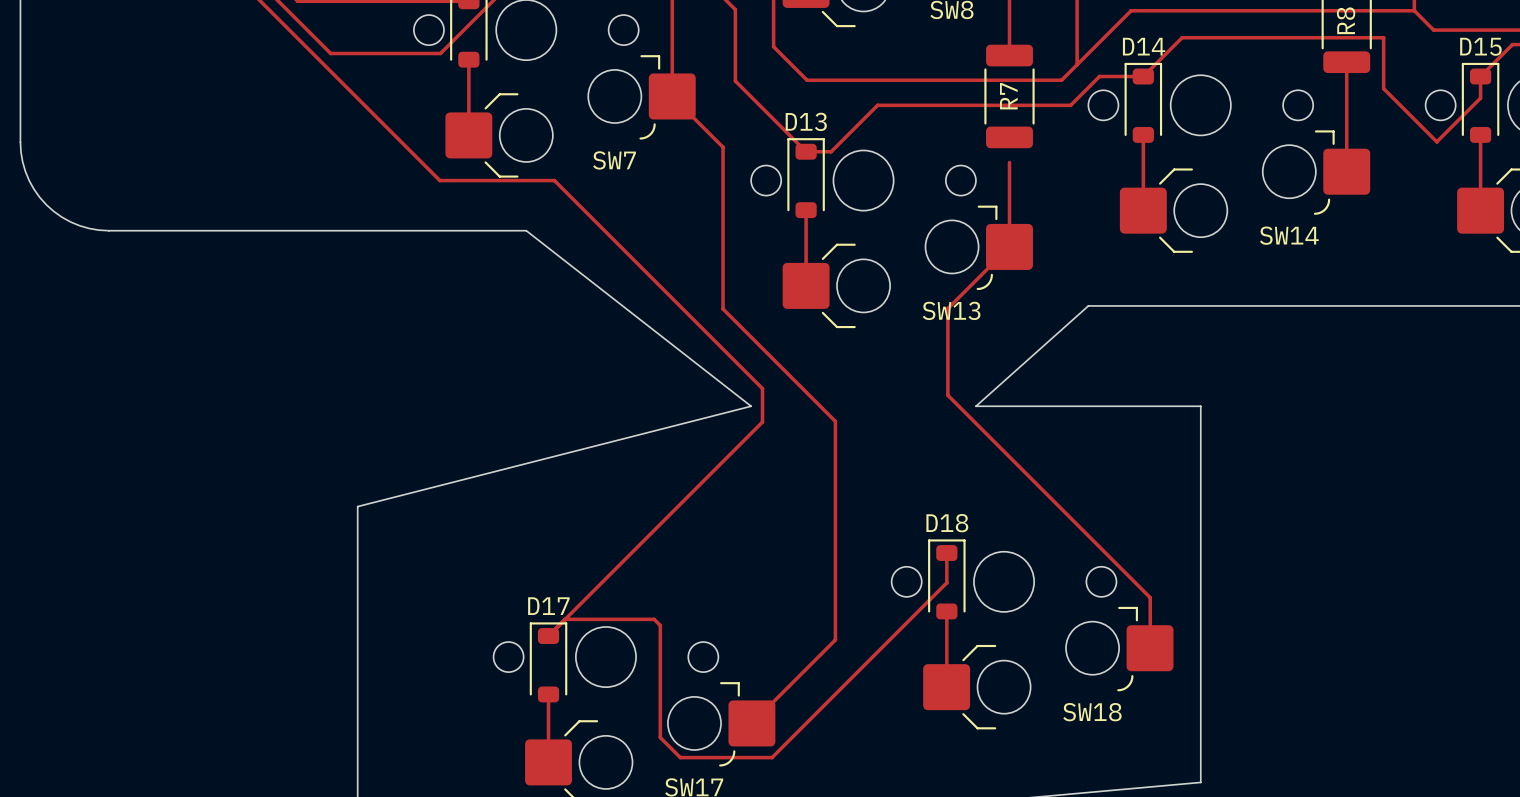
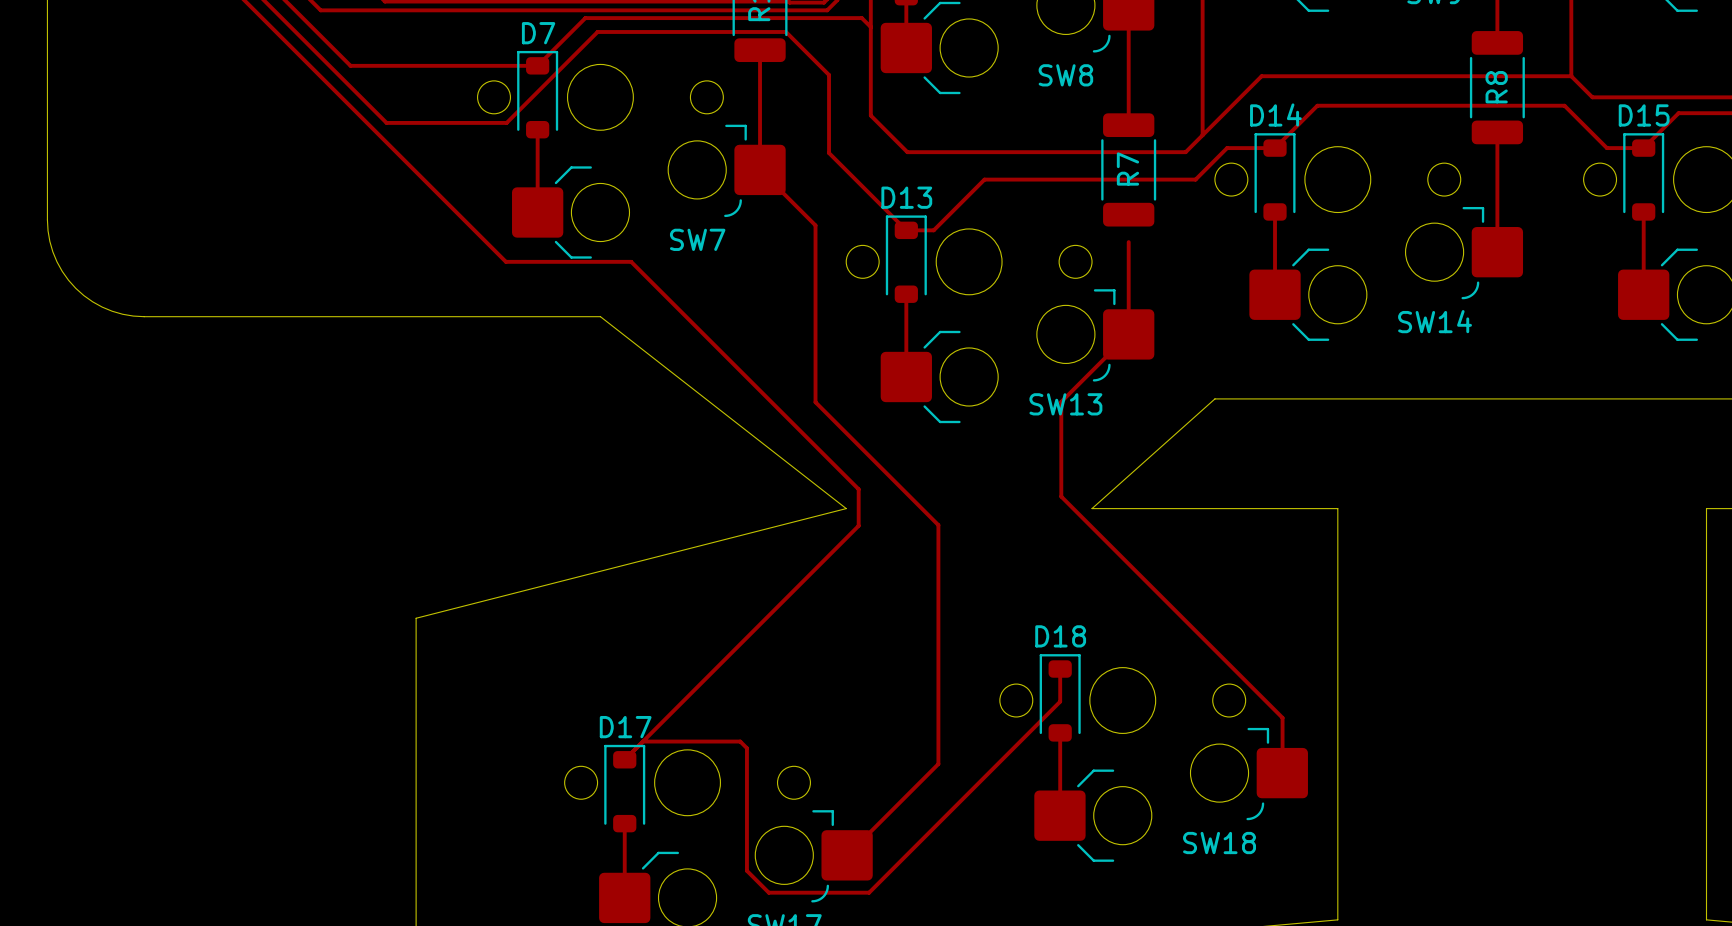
top track: (1383, 37) (1383, 88) (1436, 141) (1480, 98) (1480, 76) -> (1537, 105) (1564, 105) (1606, 148) (1643, 148)

